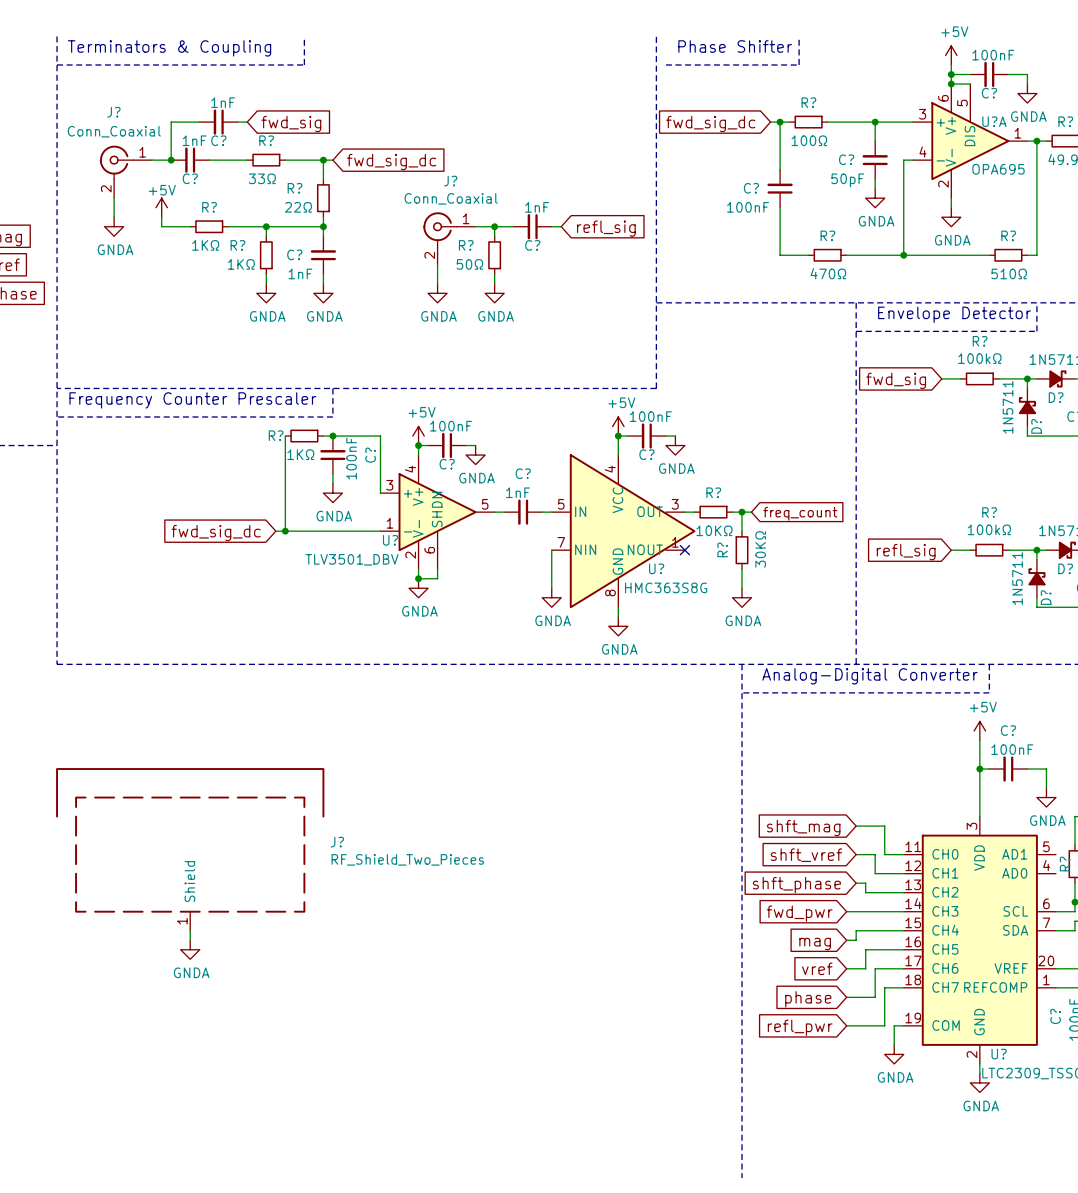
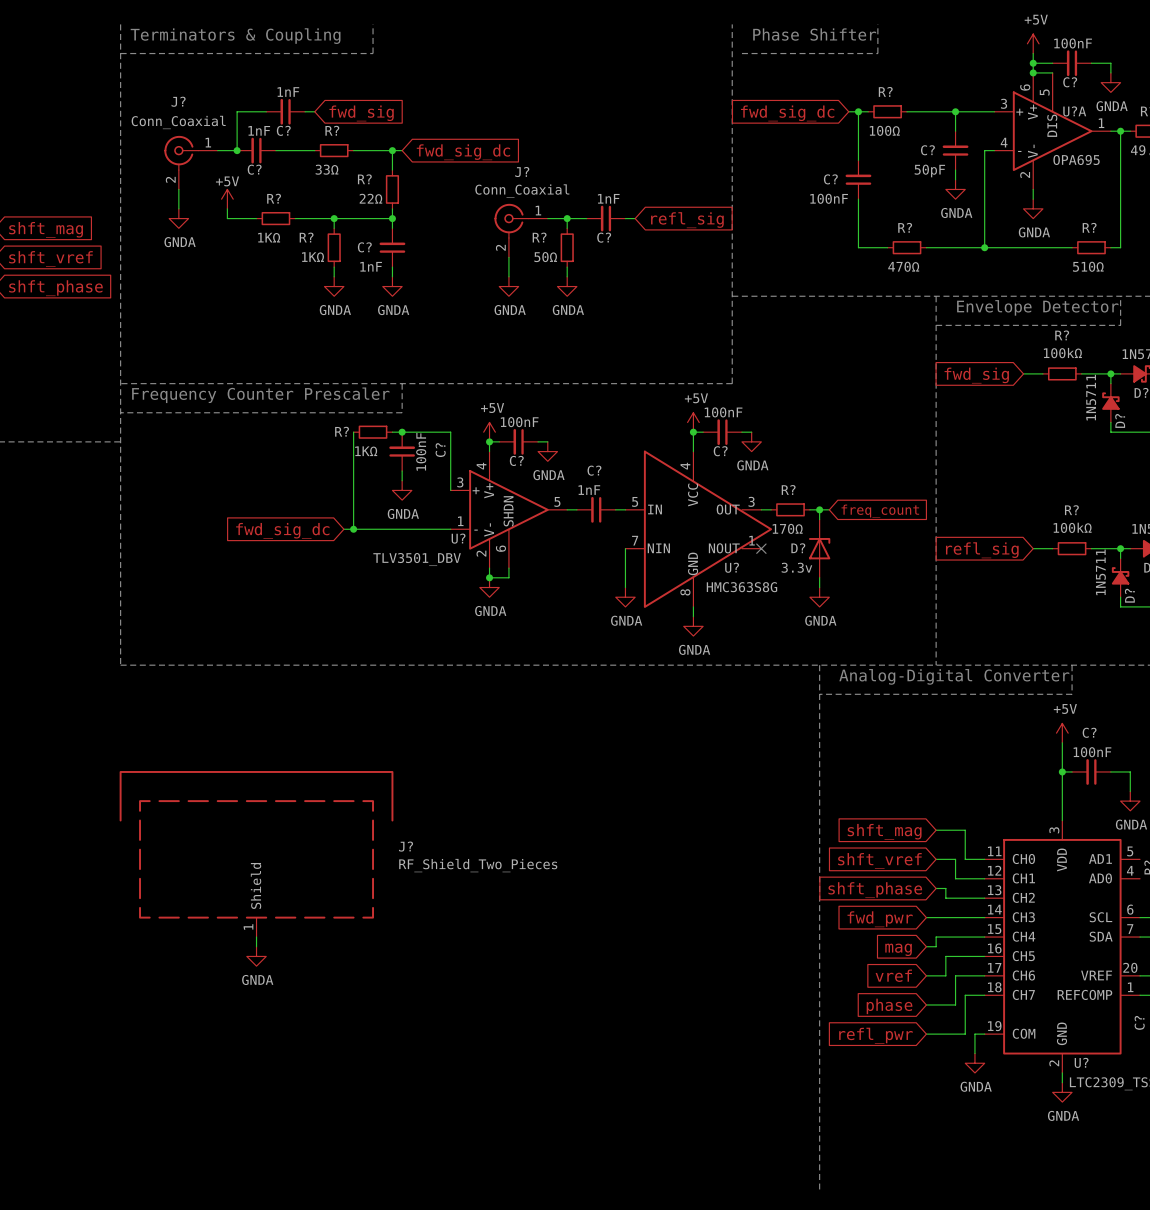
R? value: 10KΩ (714, 530) -> 170Ω (787, 528)
R?: 30KΩ (742, 550) -> none
D?: none -> 3.3v (819, 548)

